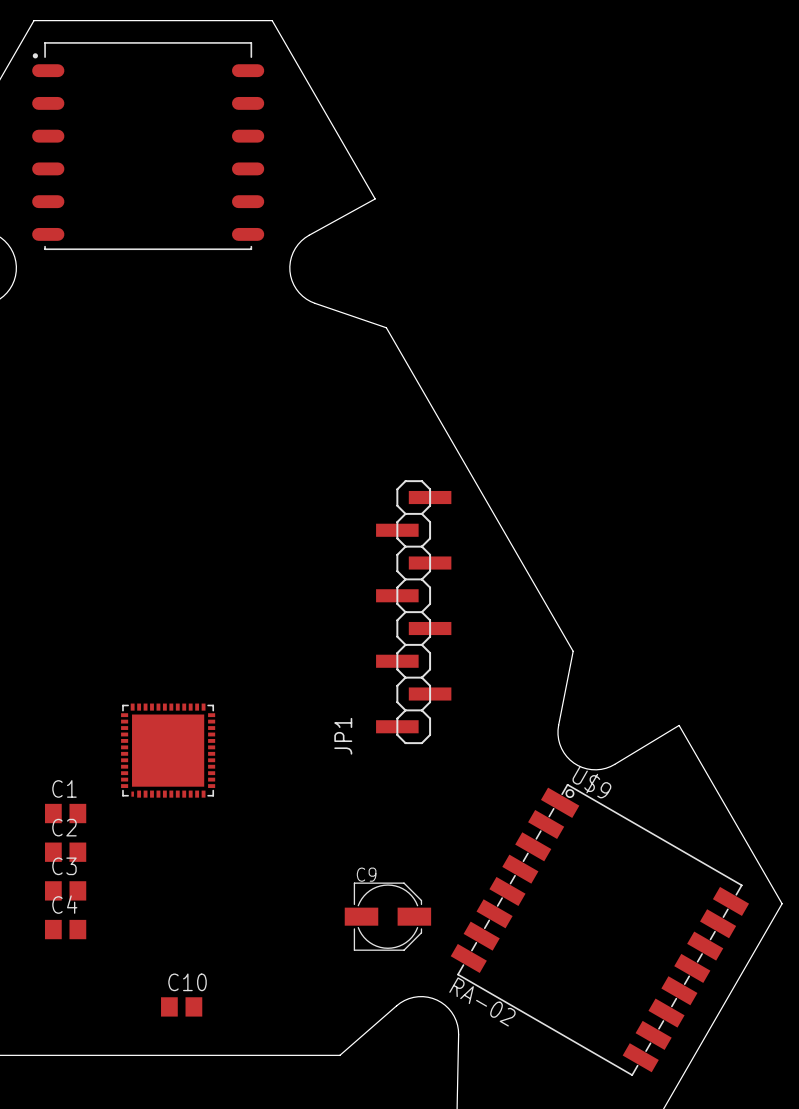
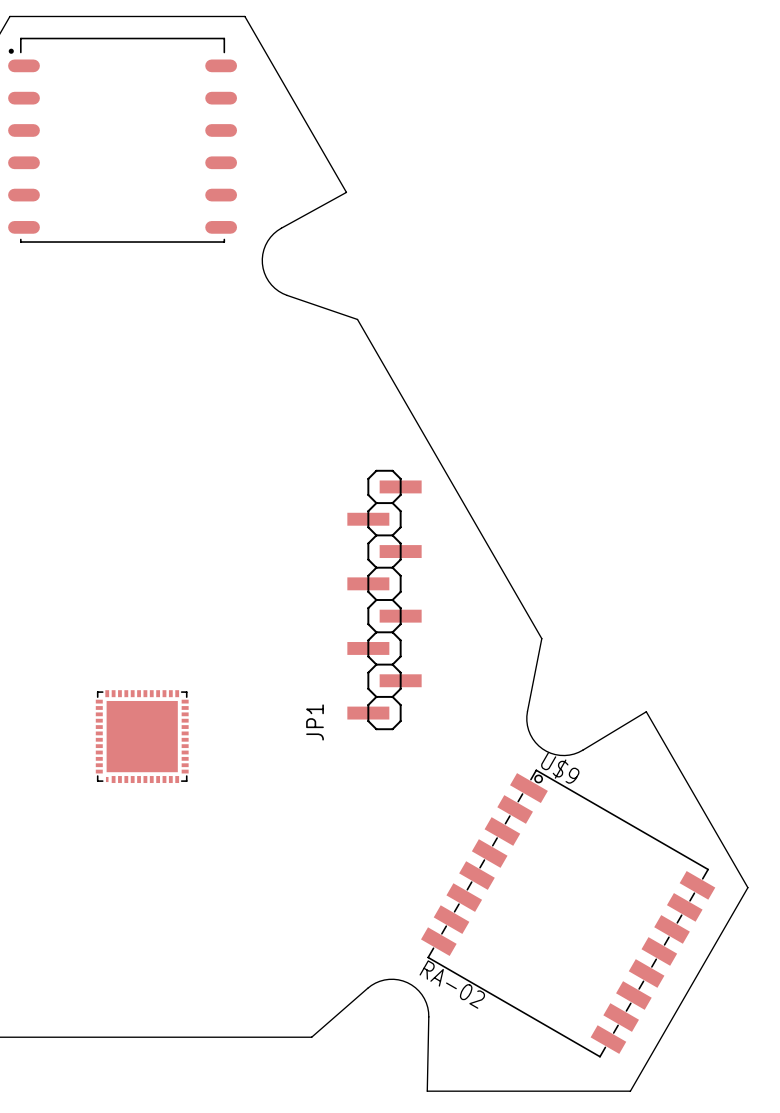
C1: (65, 813) -> none
C2: (65, 852) -> none
C3: (65, 890) -> none
C9: (387, 916) -> none
C4: (65, 929) -> none
C10: (181, 1006) -> none

